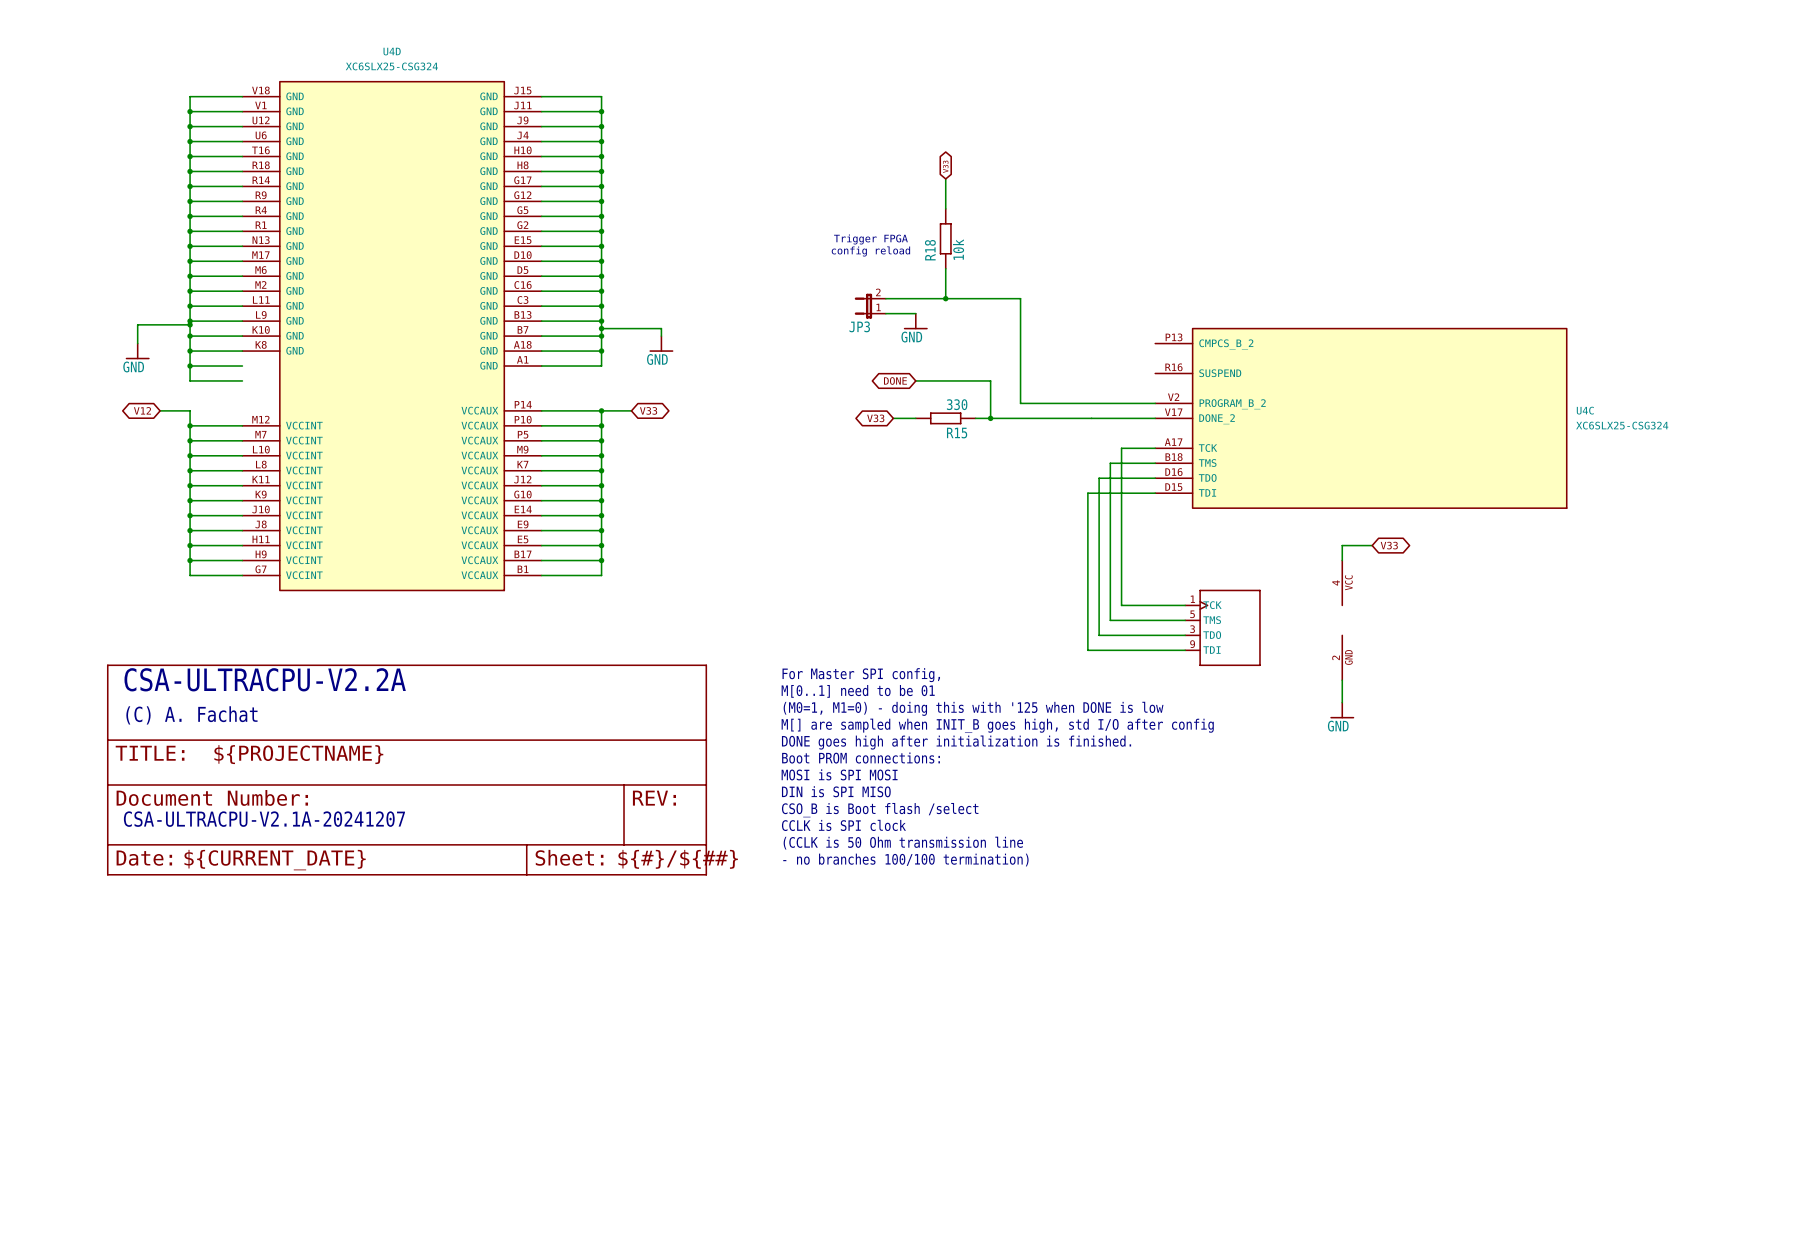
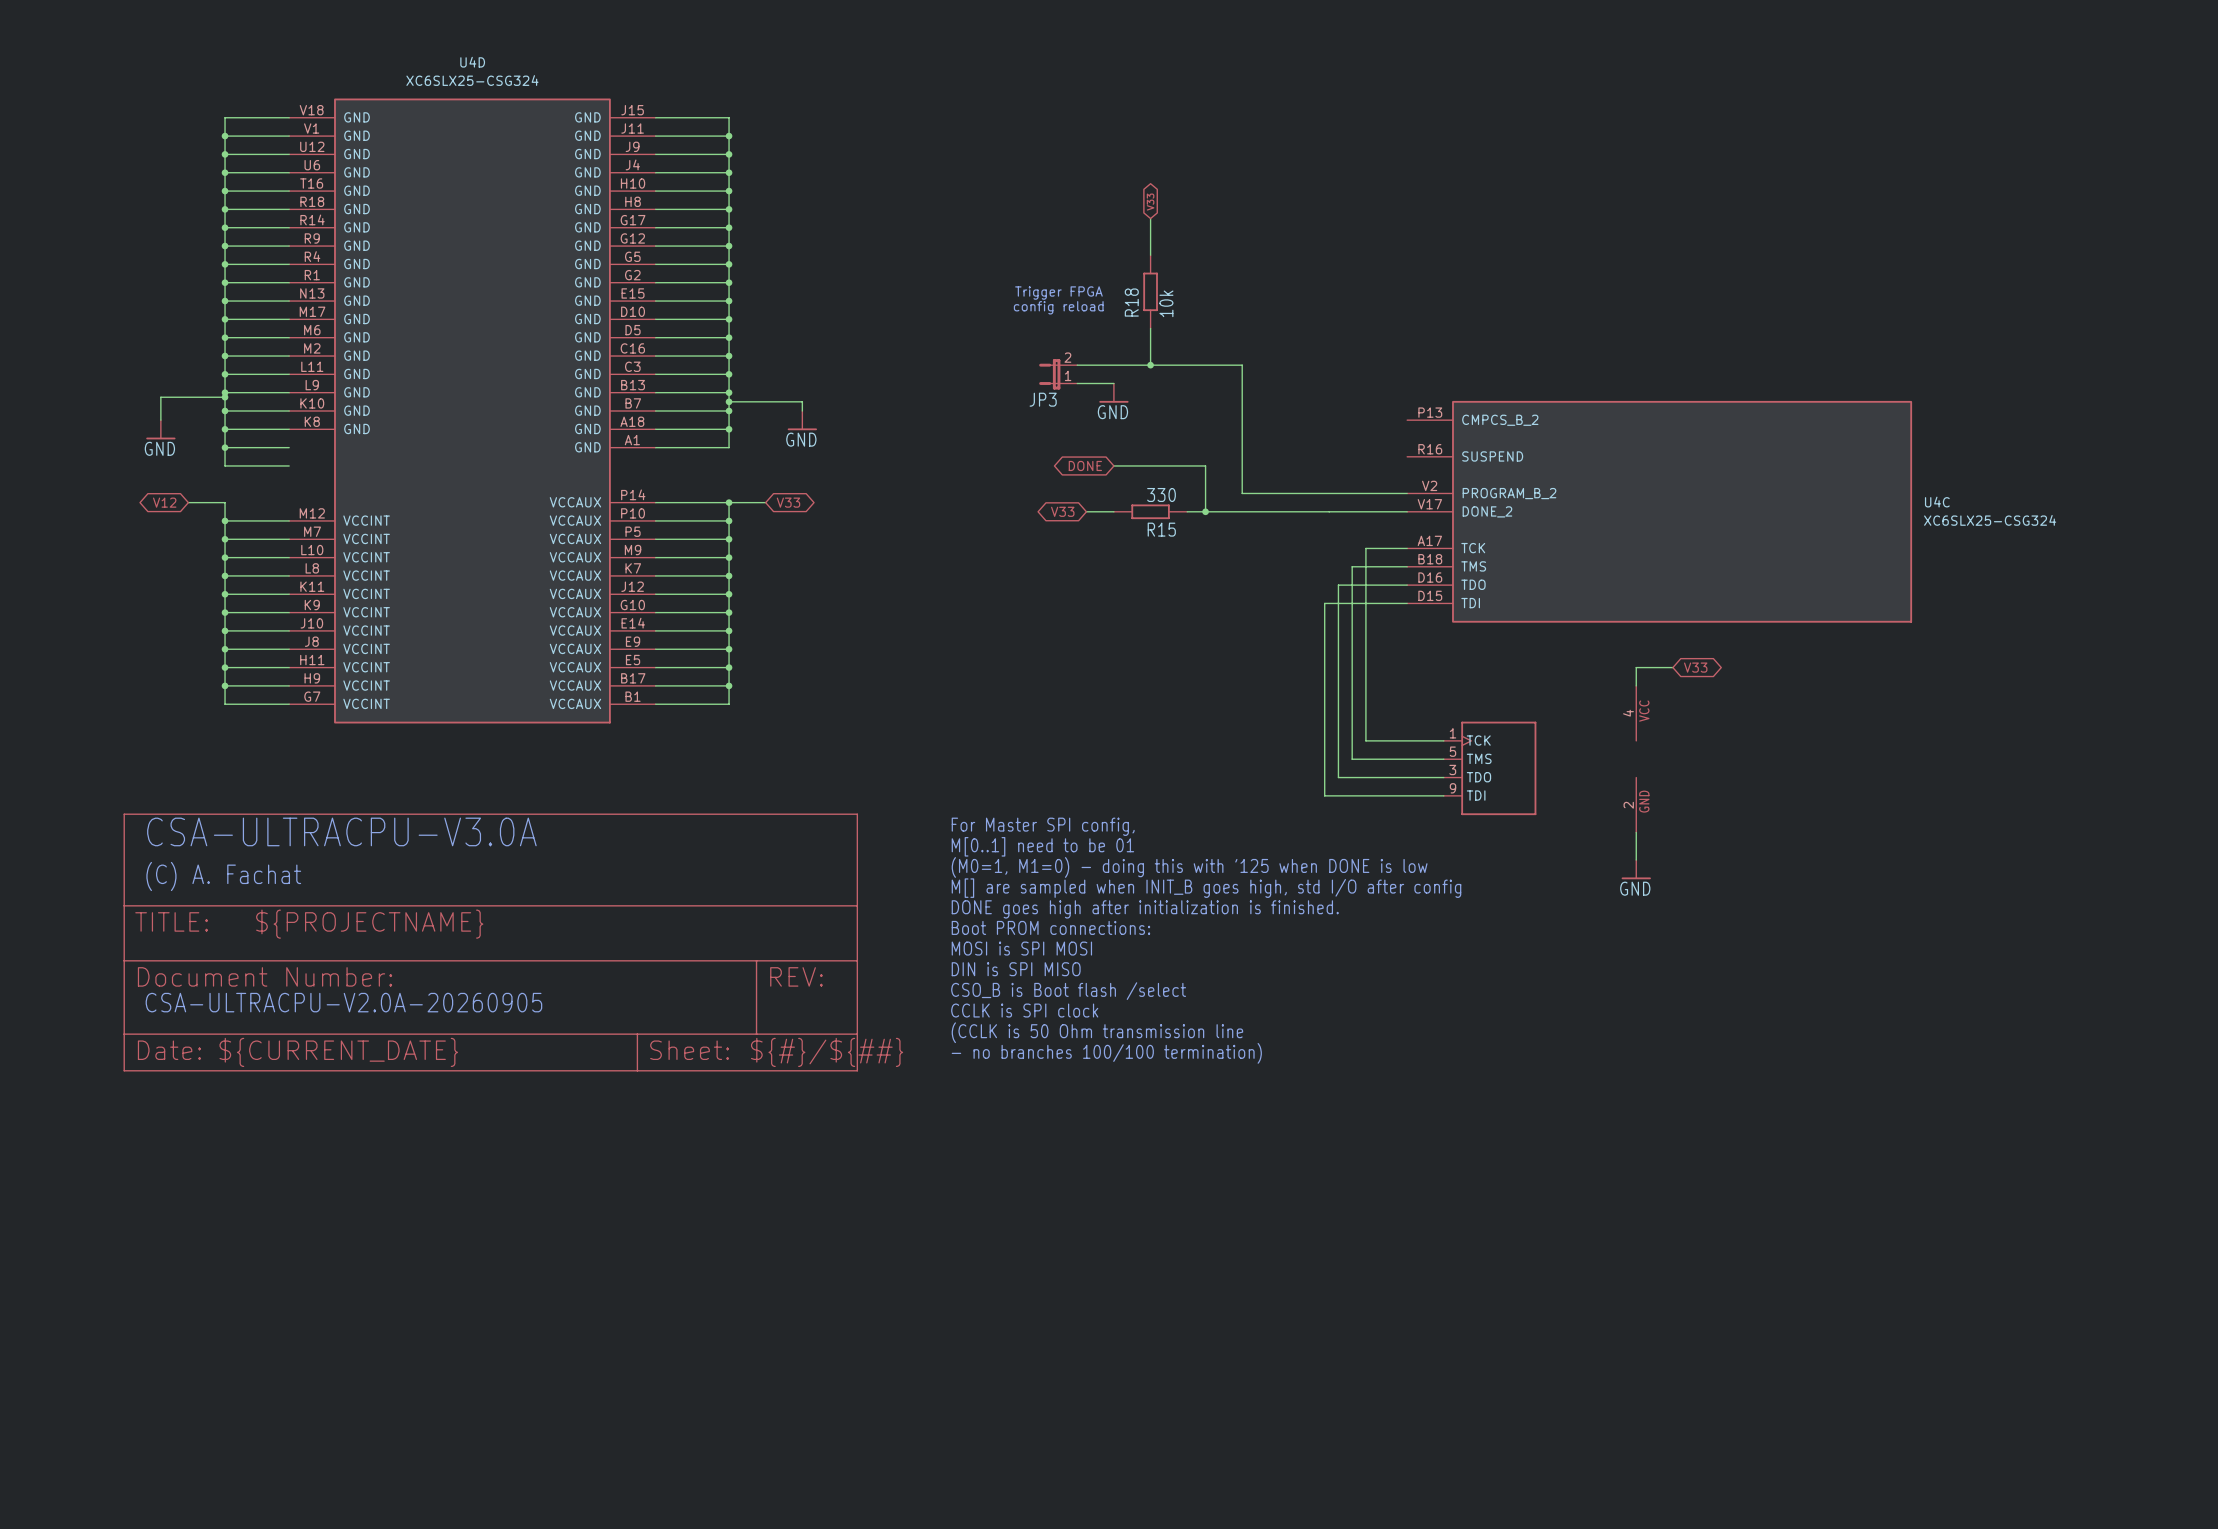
text: CSA-ULTRACPU-V2.2A (265, 679) -> CSA-ULTRACPU-V3.0A (341, 831)
text: CSA-ULTRACPU-V2.1A-20241207 (264, 819) -> CSA-ULTRACPU-V2.0A-20260905 (343, 1002)

